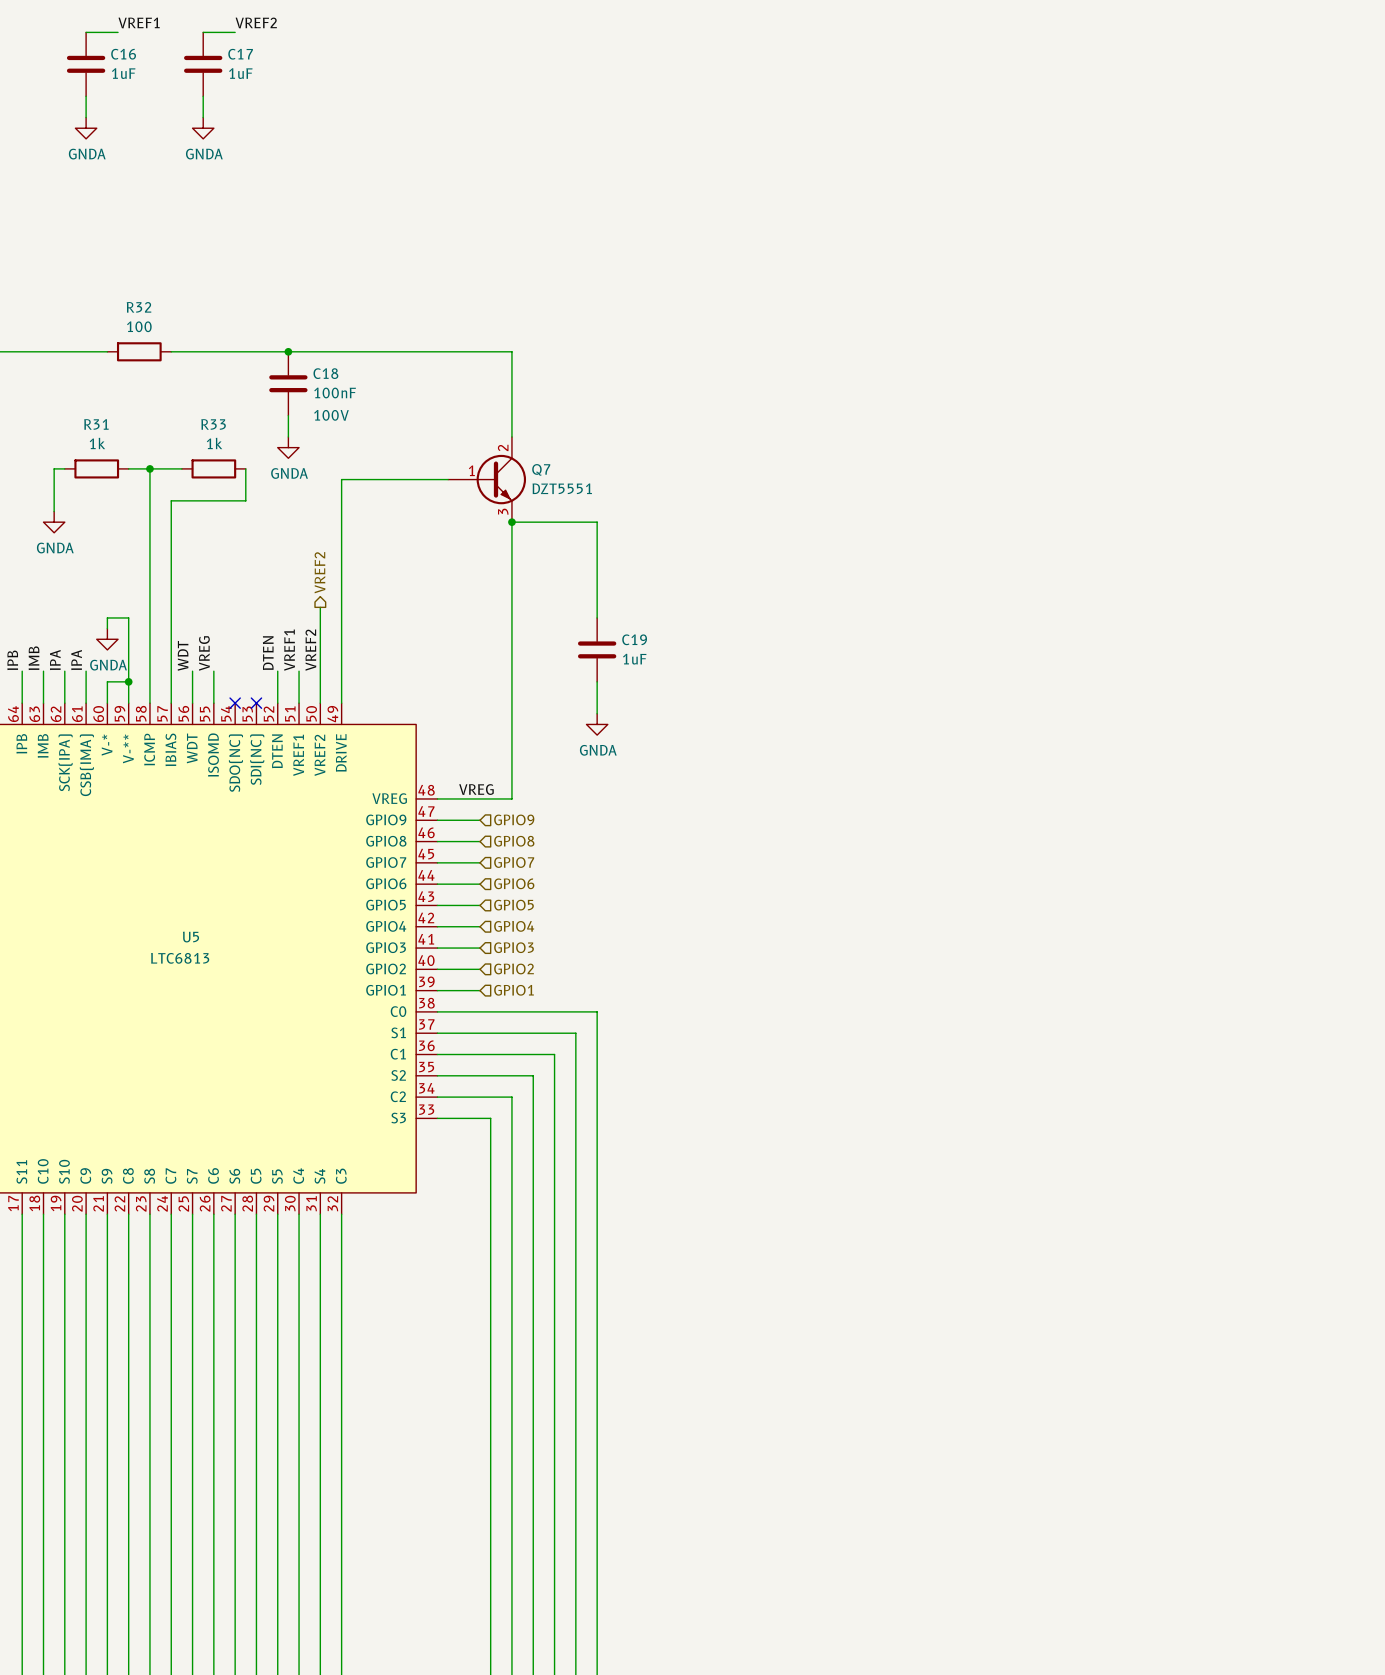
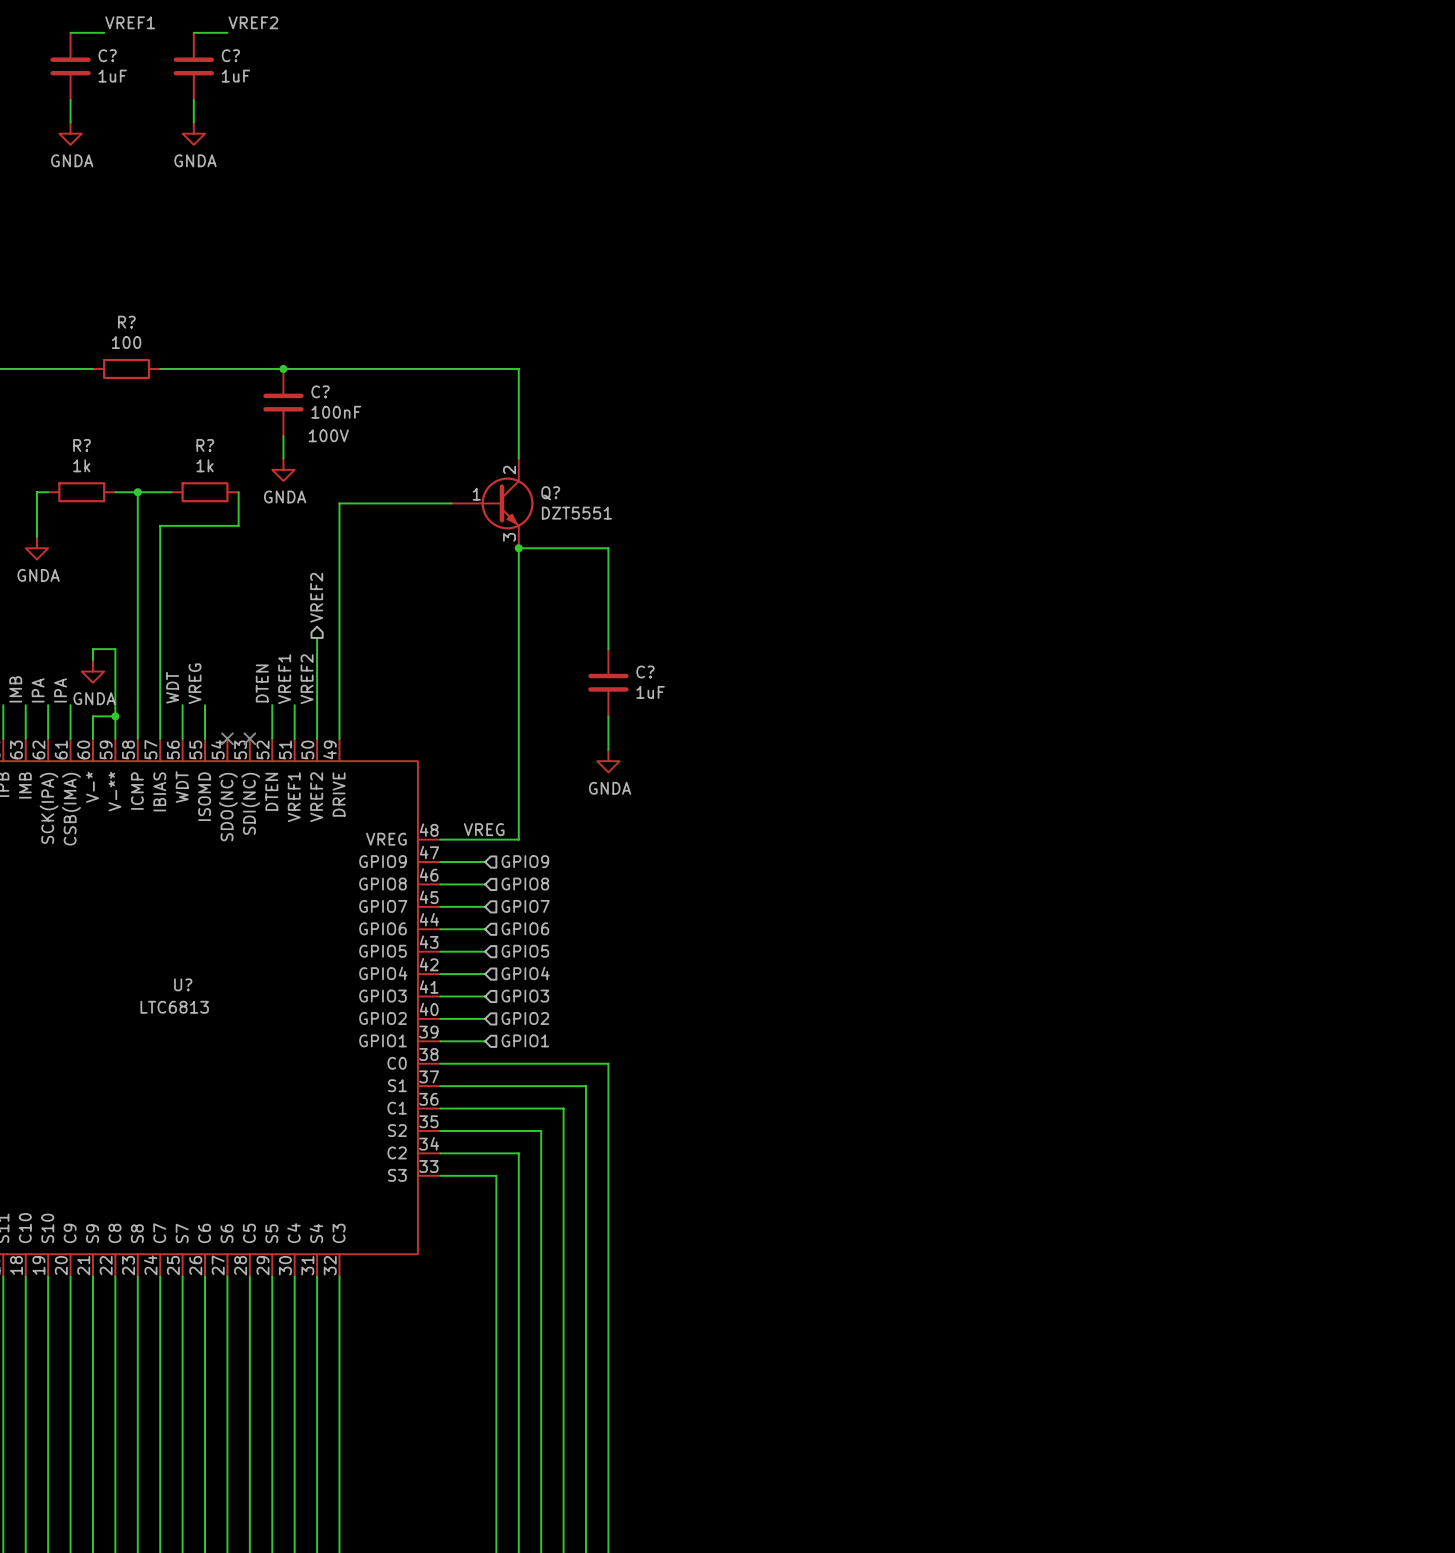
C16 name: C16 (123, 54) -> C? (107, 55)
C17 name: C17 (240, 54) -> C? (230, 55)
R32 name: R32 (139, 307) -> R? (126, 322)
C18 name: C18 (325, 373) -> C? (320, 391)
R31 name: R31 (96, 424) -> R? (82, 445)
R33 name: R33 (213, 424) -> R? (205, 445)
Q7 name: Q7 (541, 469) -> Q? (550, 493)
C19 name: C19 (634, 639) -> C? (645, 672)
U5 name: U5 (191, 937) -> U? (183, 984)

